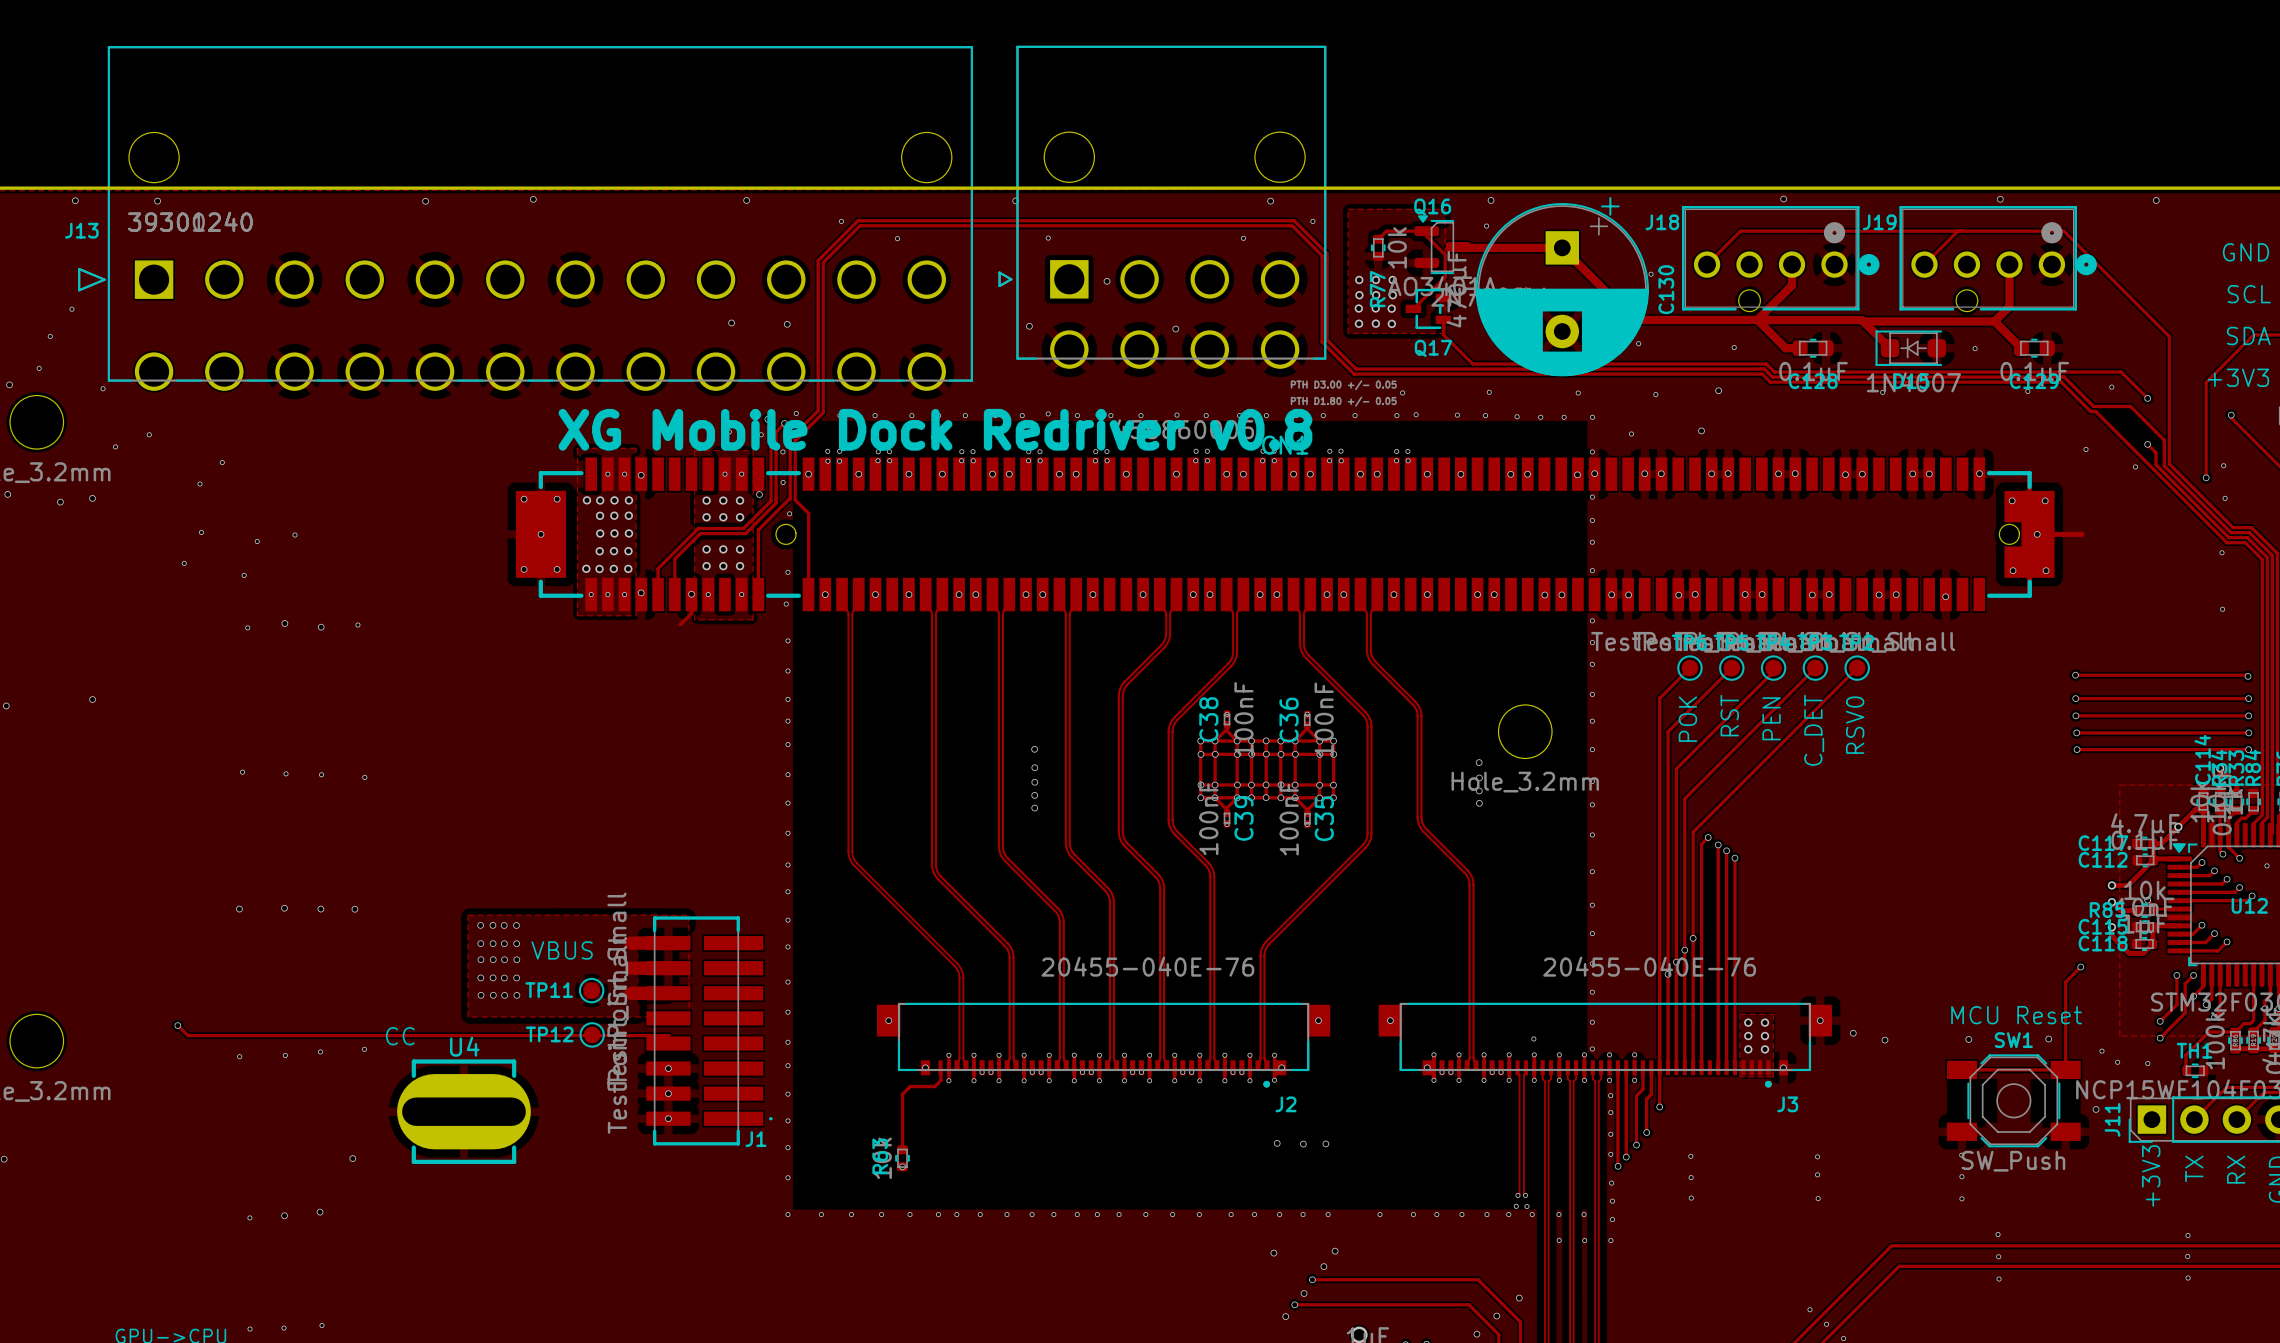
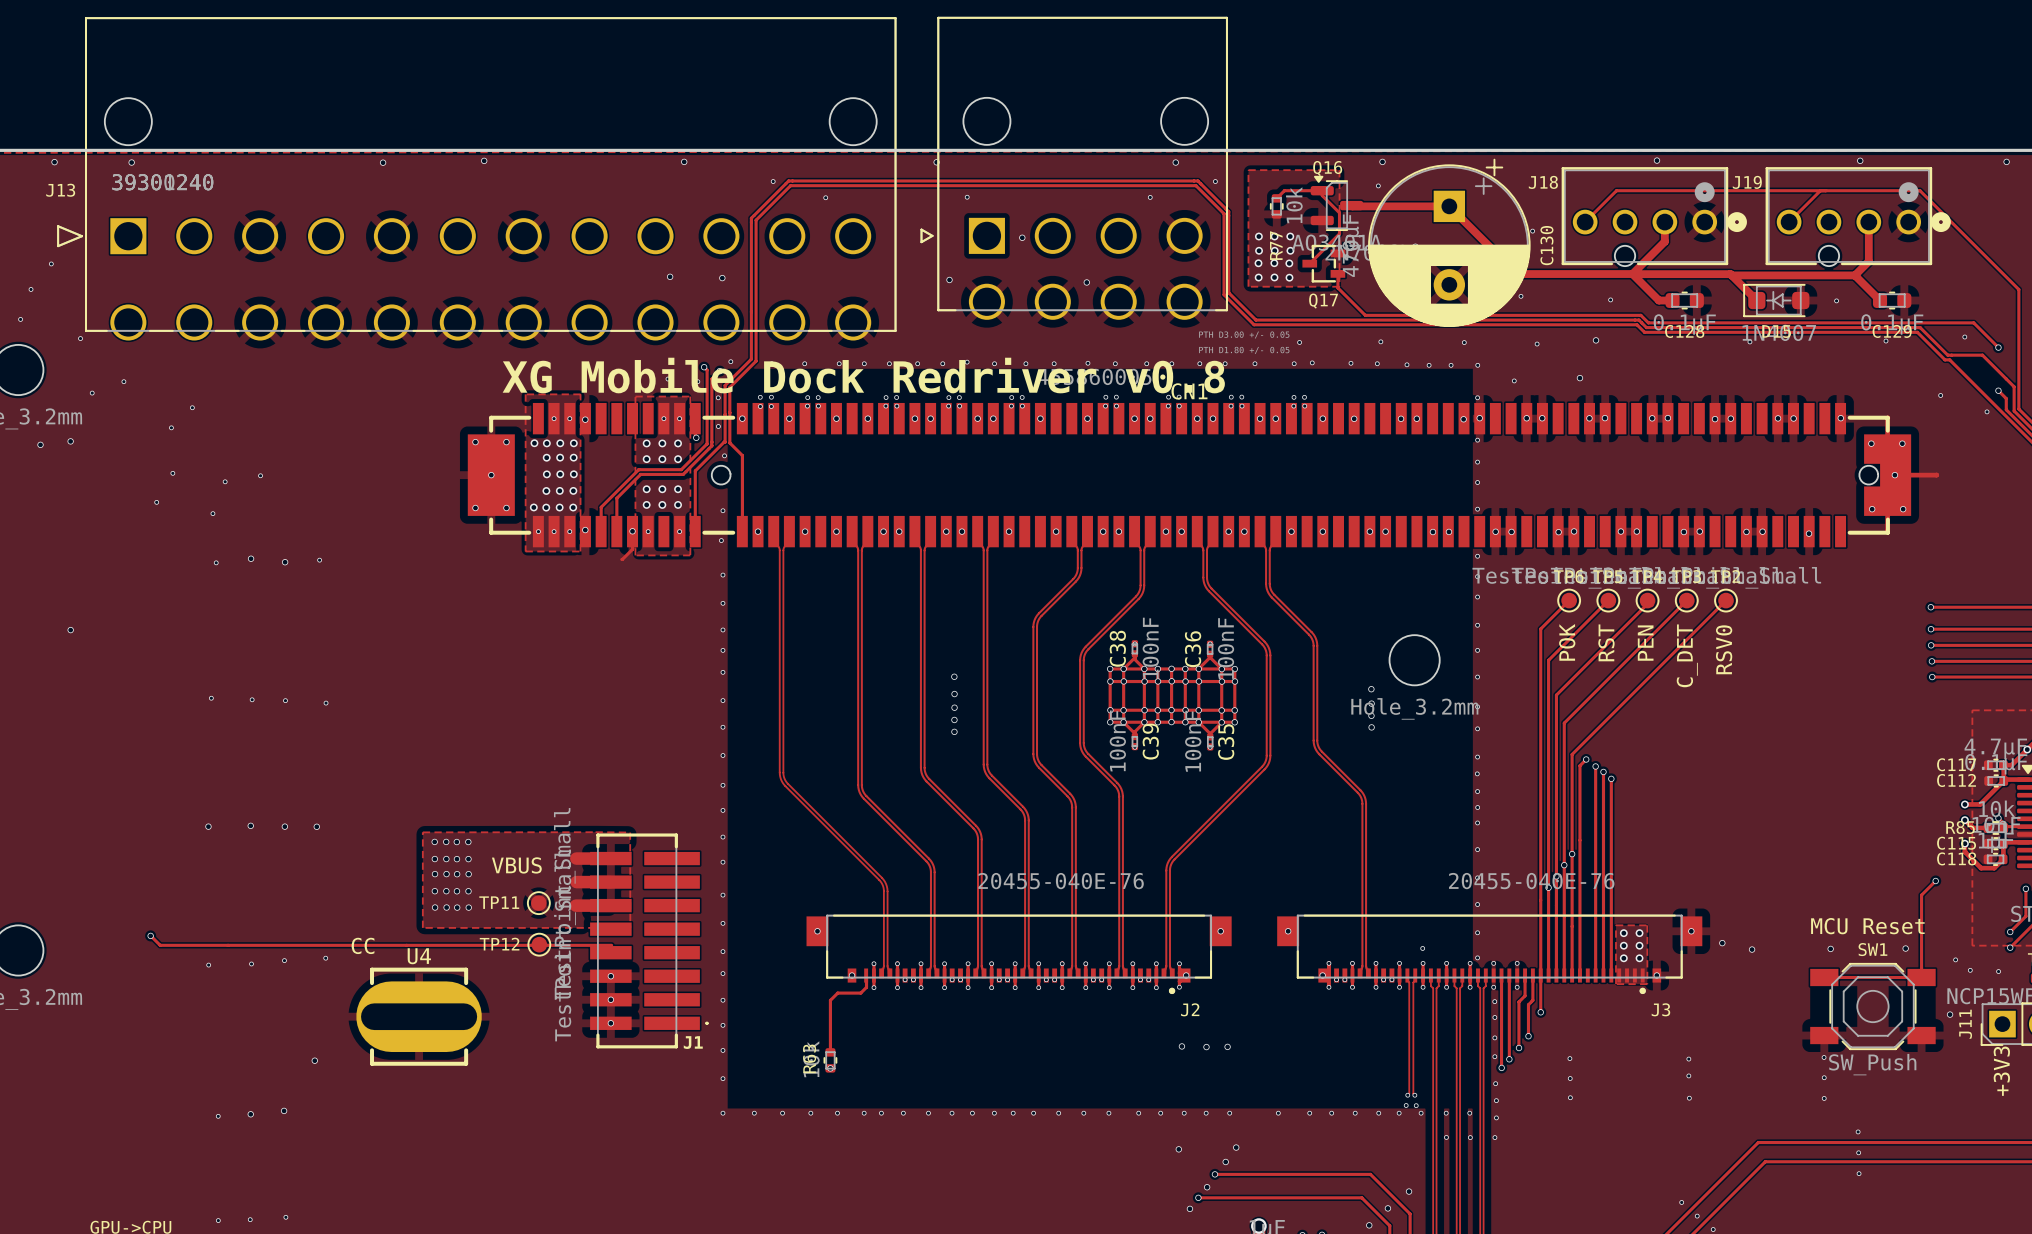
via: none -> (1477, 773)
via: none -> (1477, 807)

